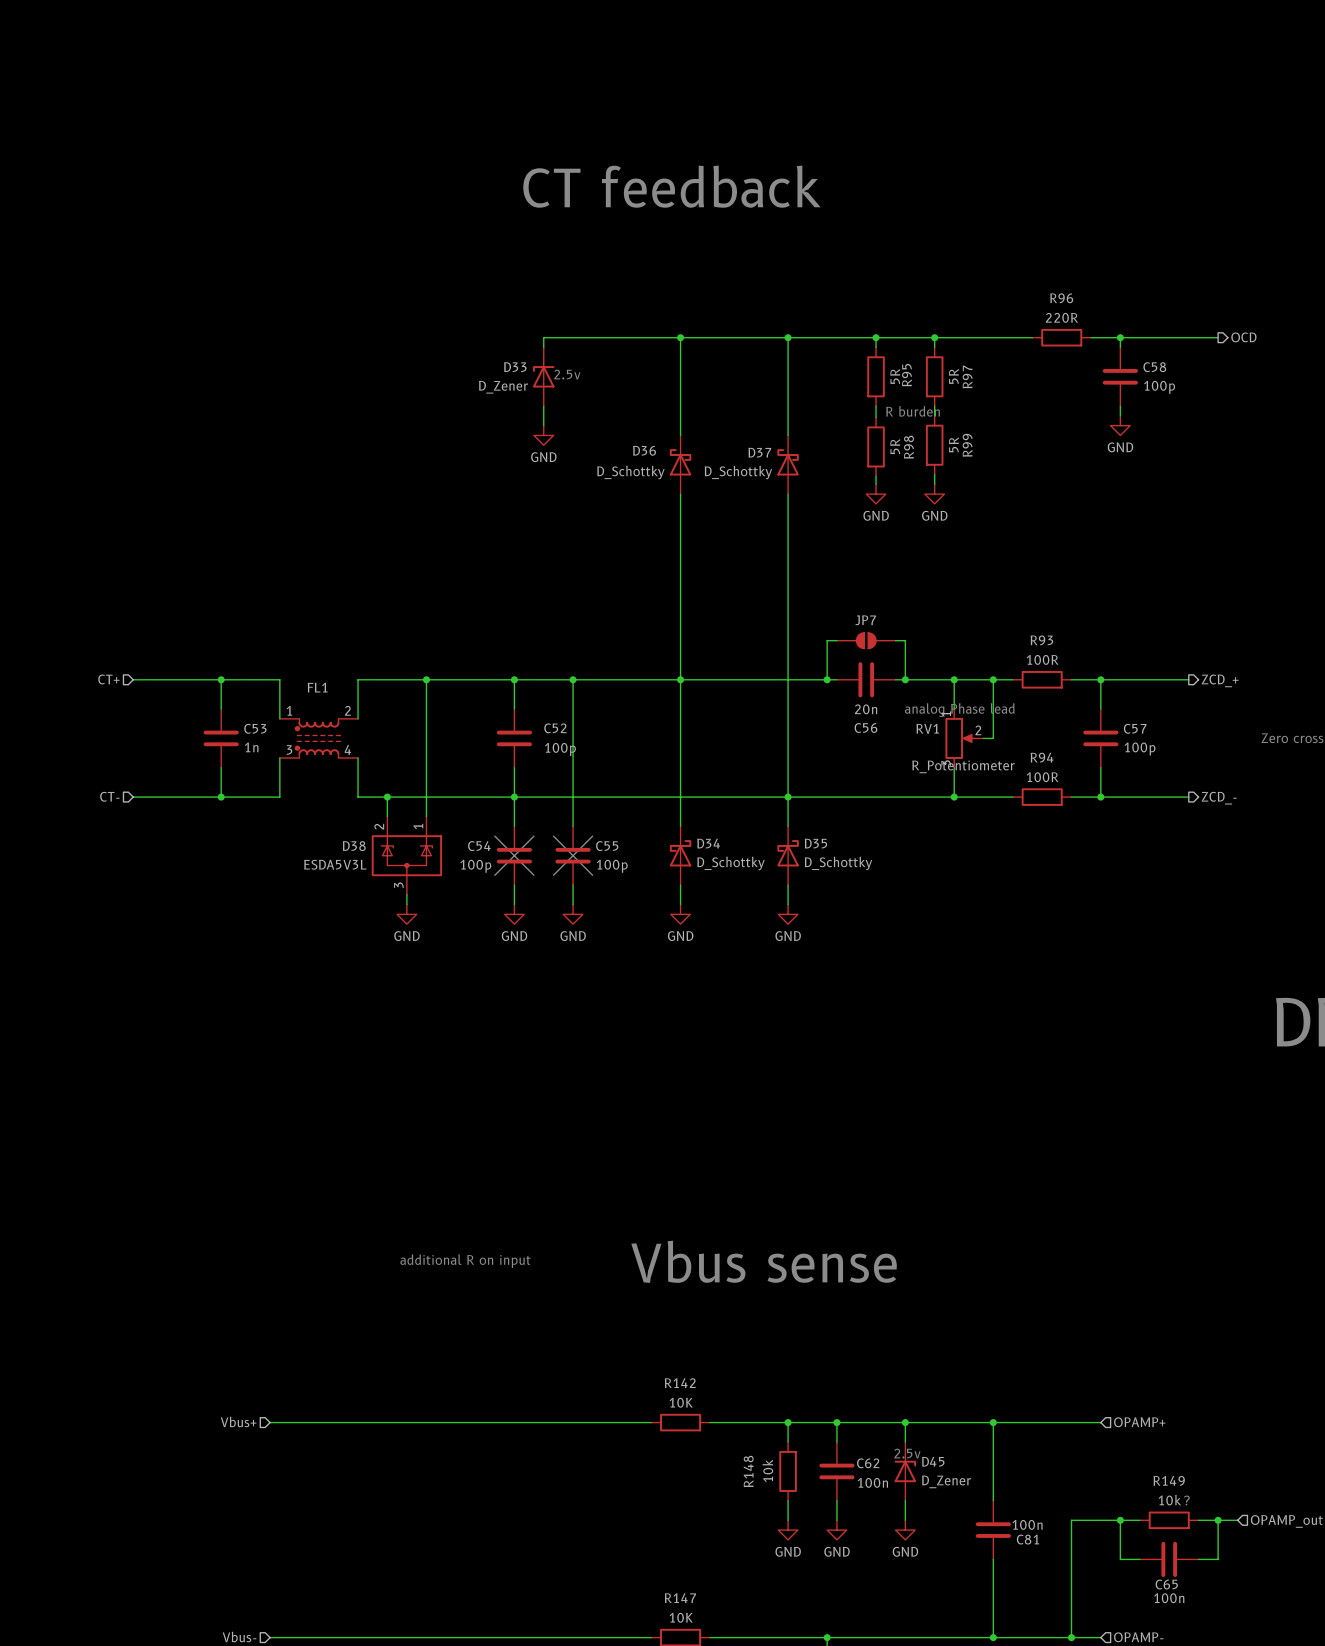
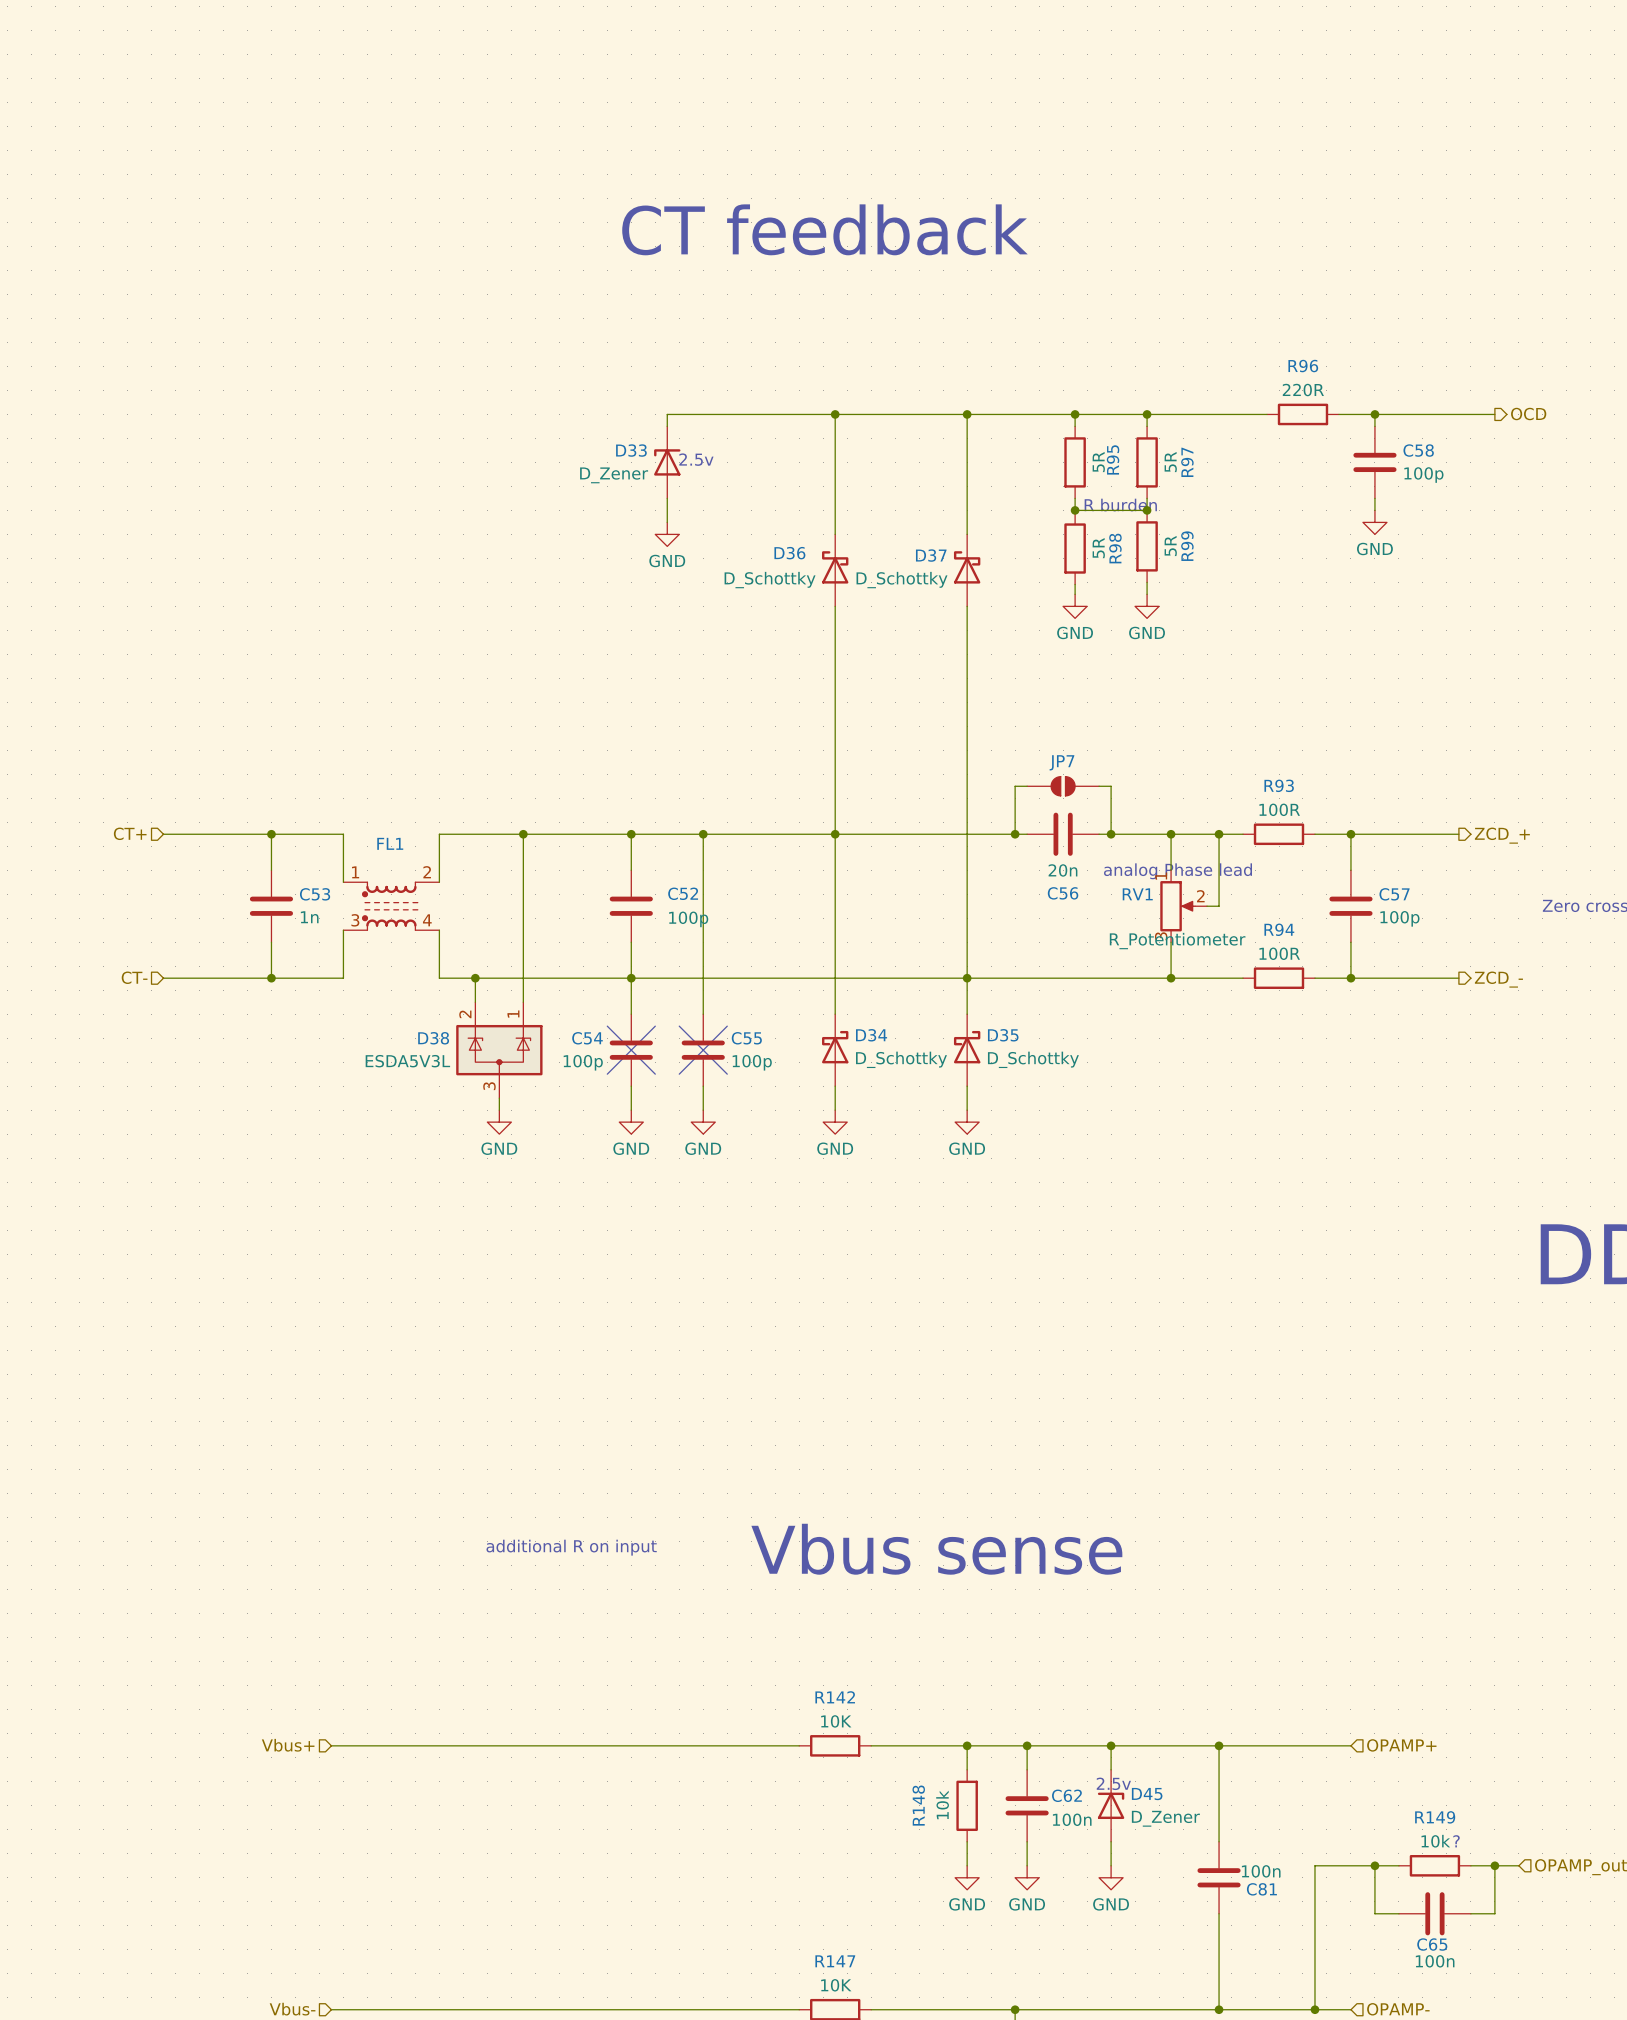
wire: none -> (1075, 510) (1147, 510)
junction: none -> (1075, 510)
junction: none -> (1147, 510)

